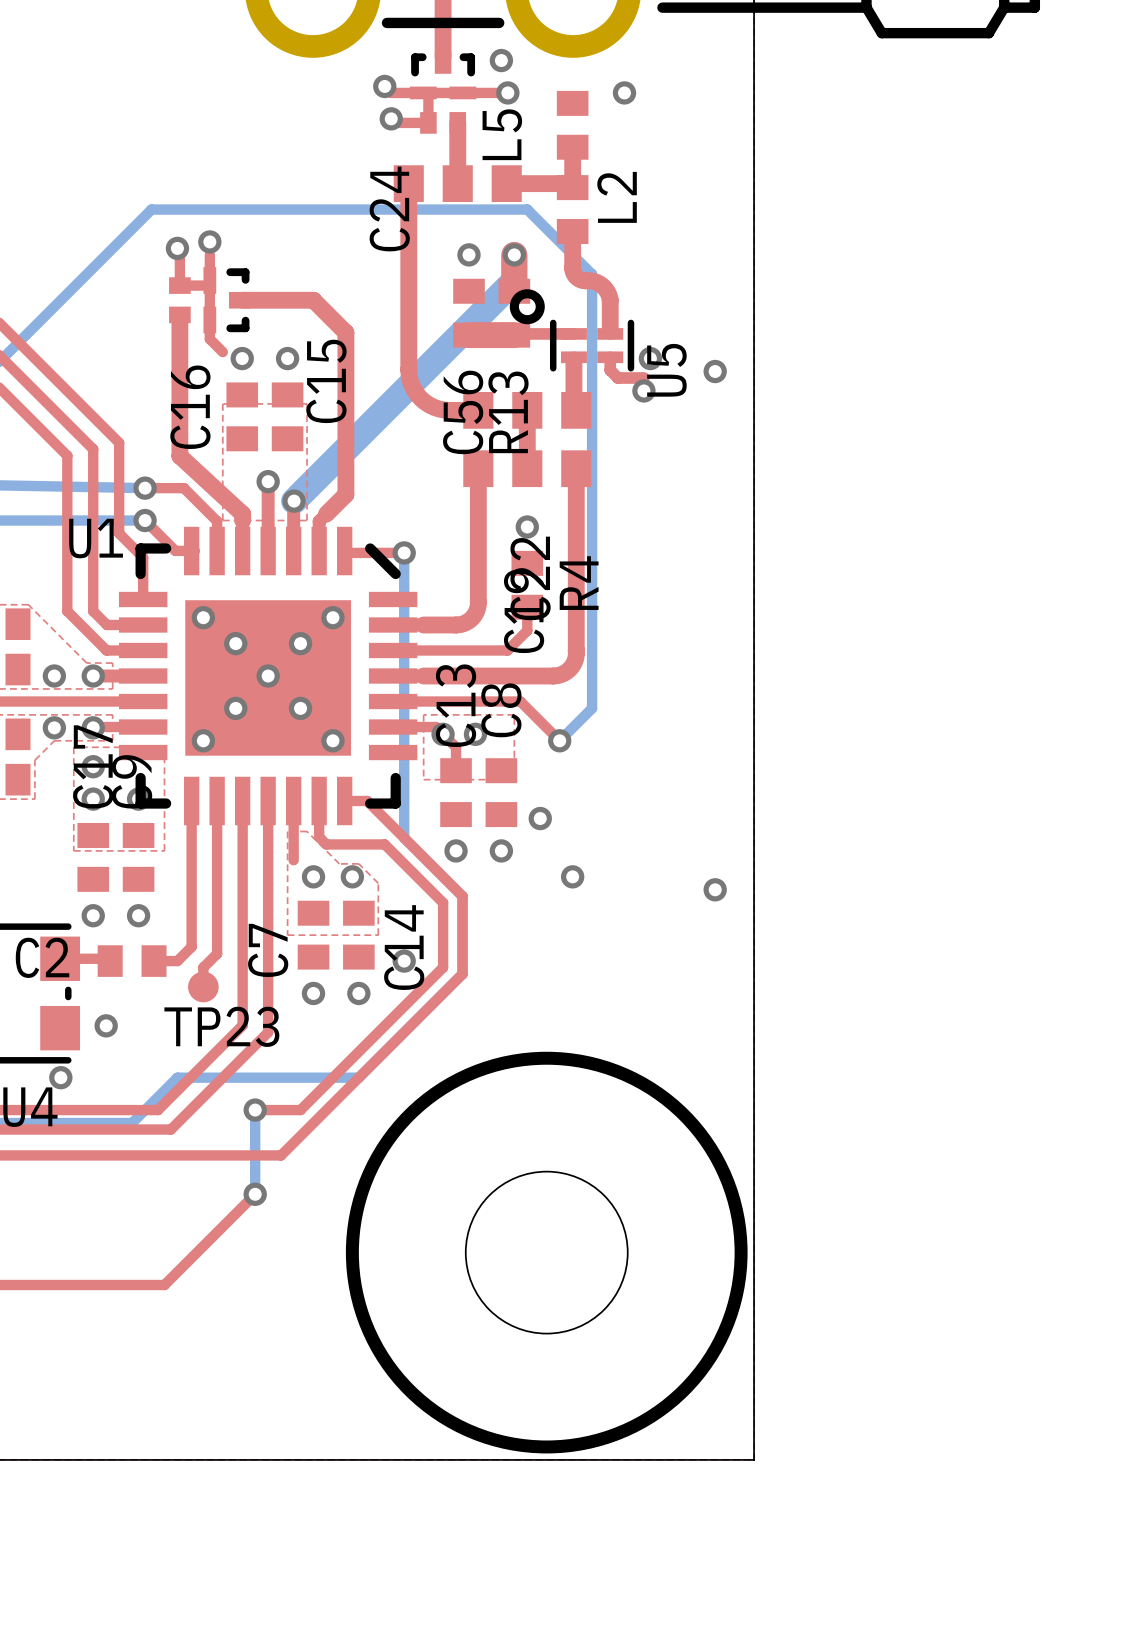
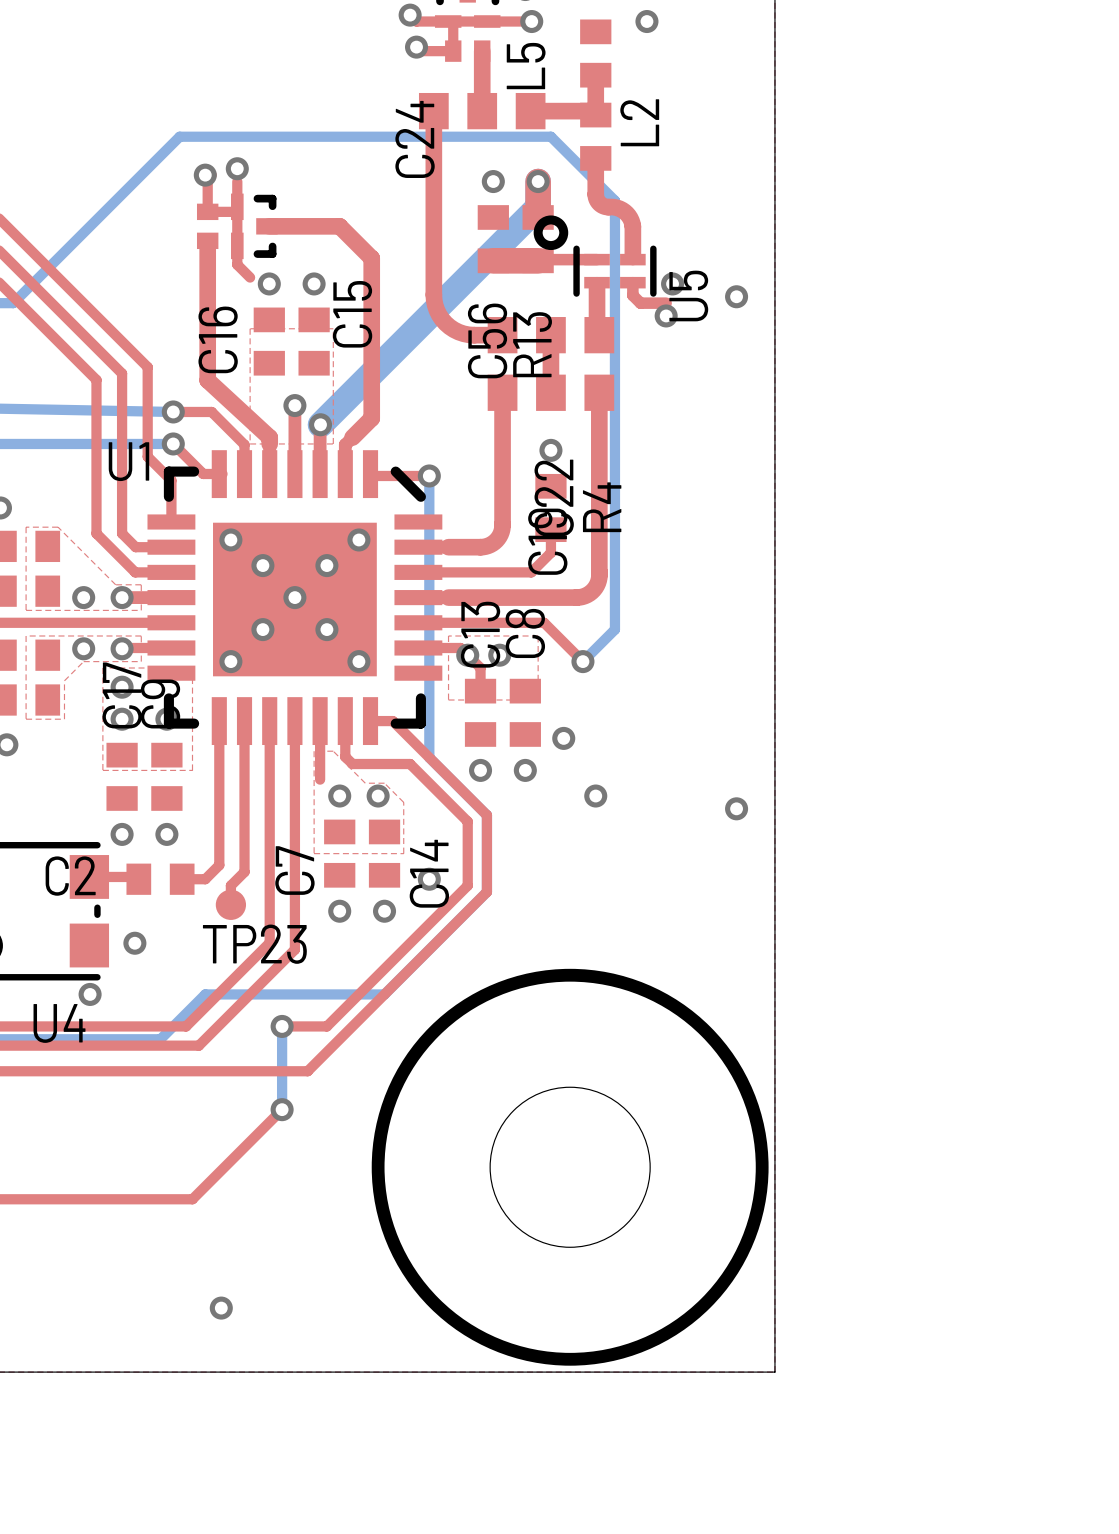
via: none -> (221, 1308)

